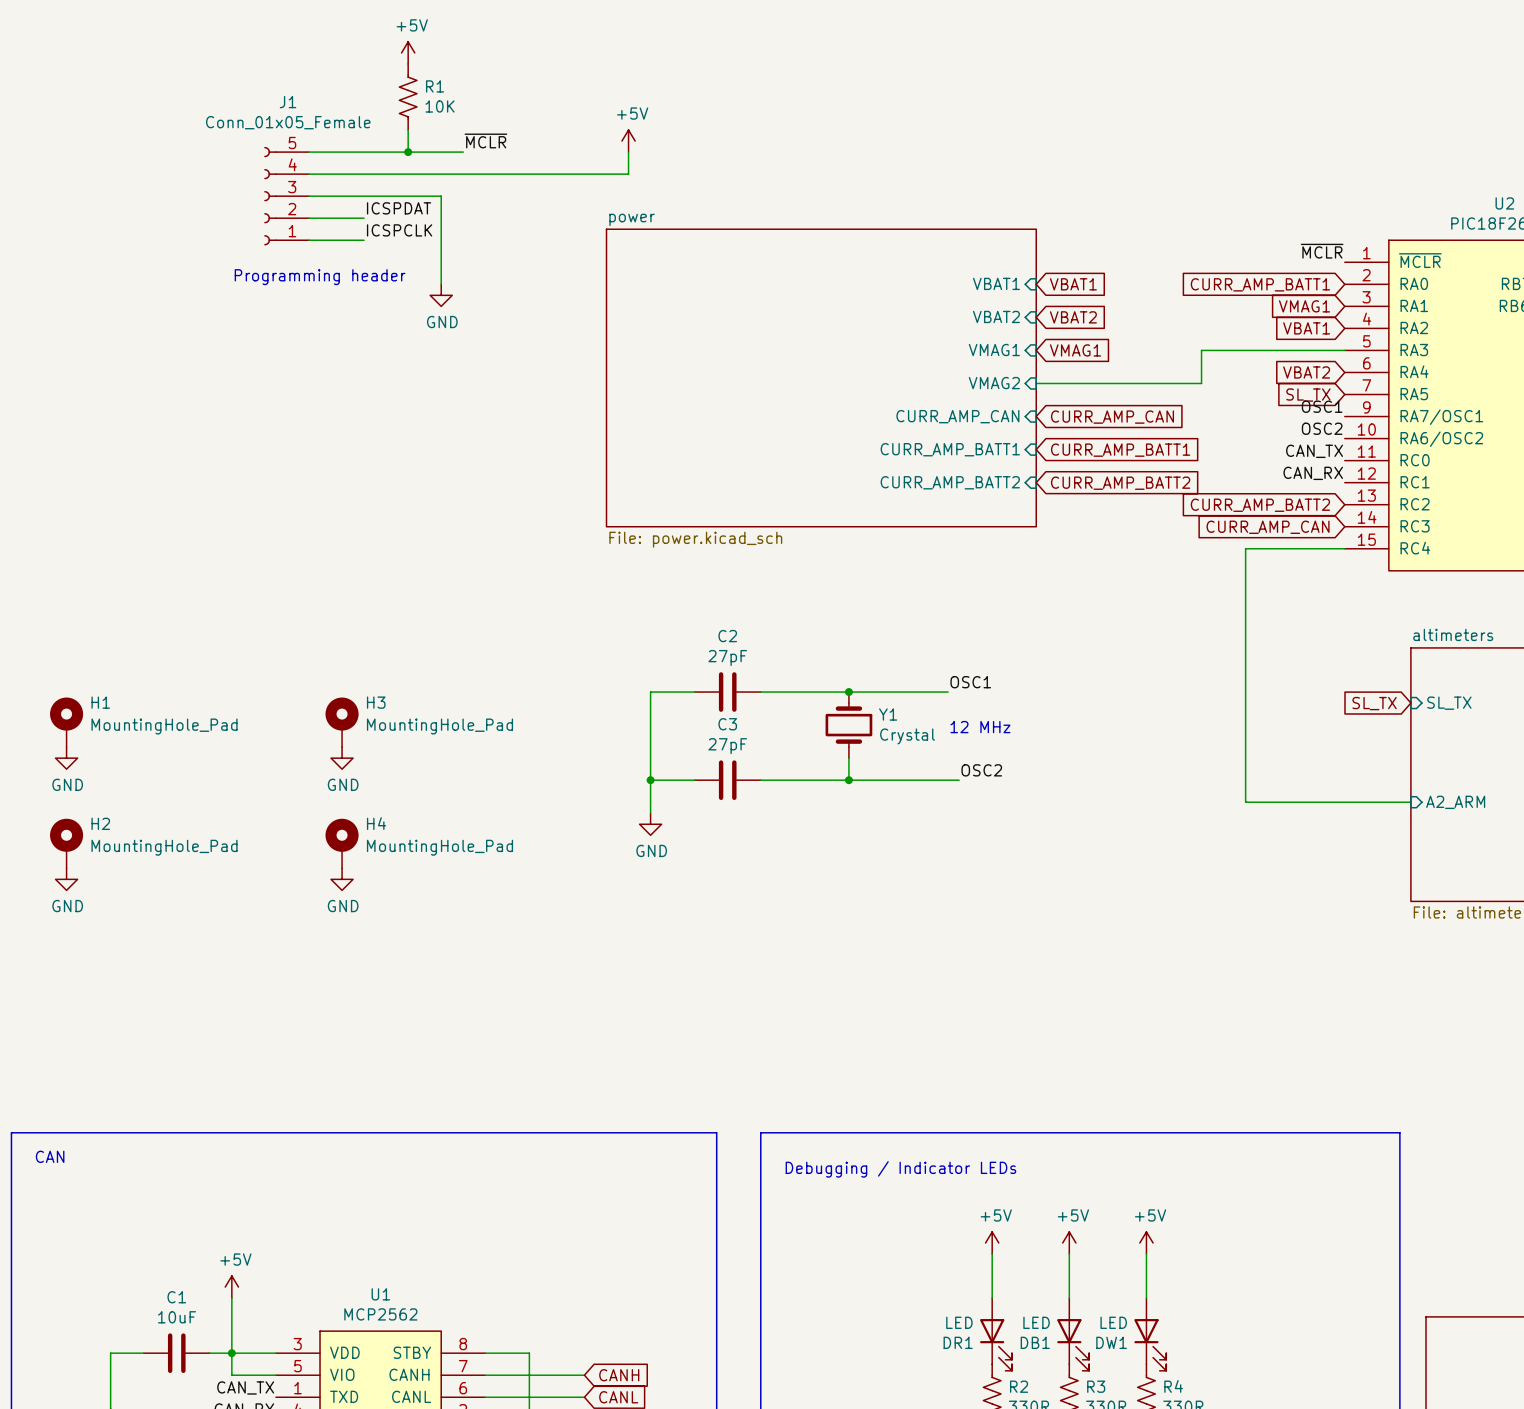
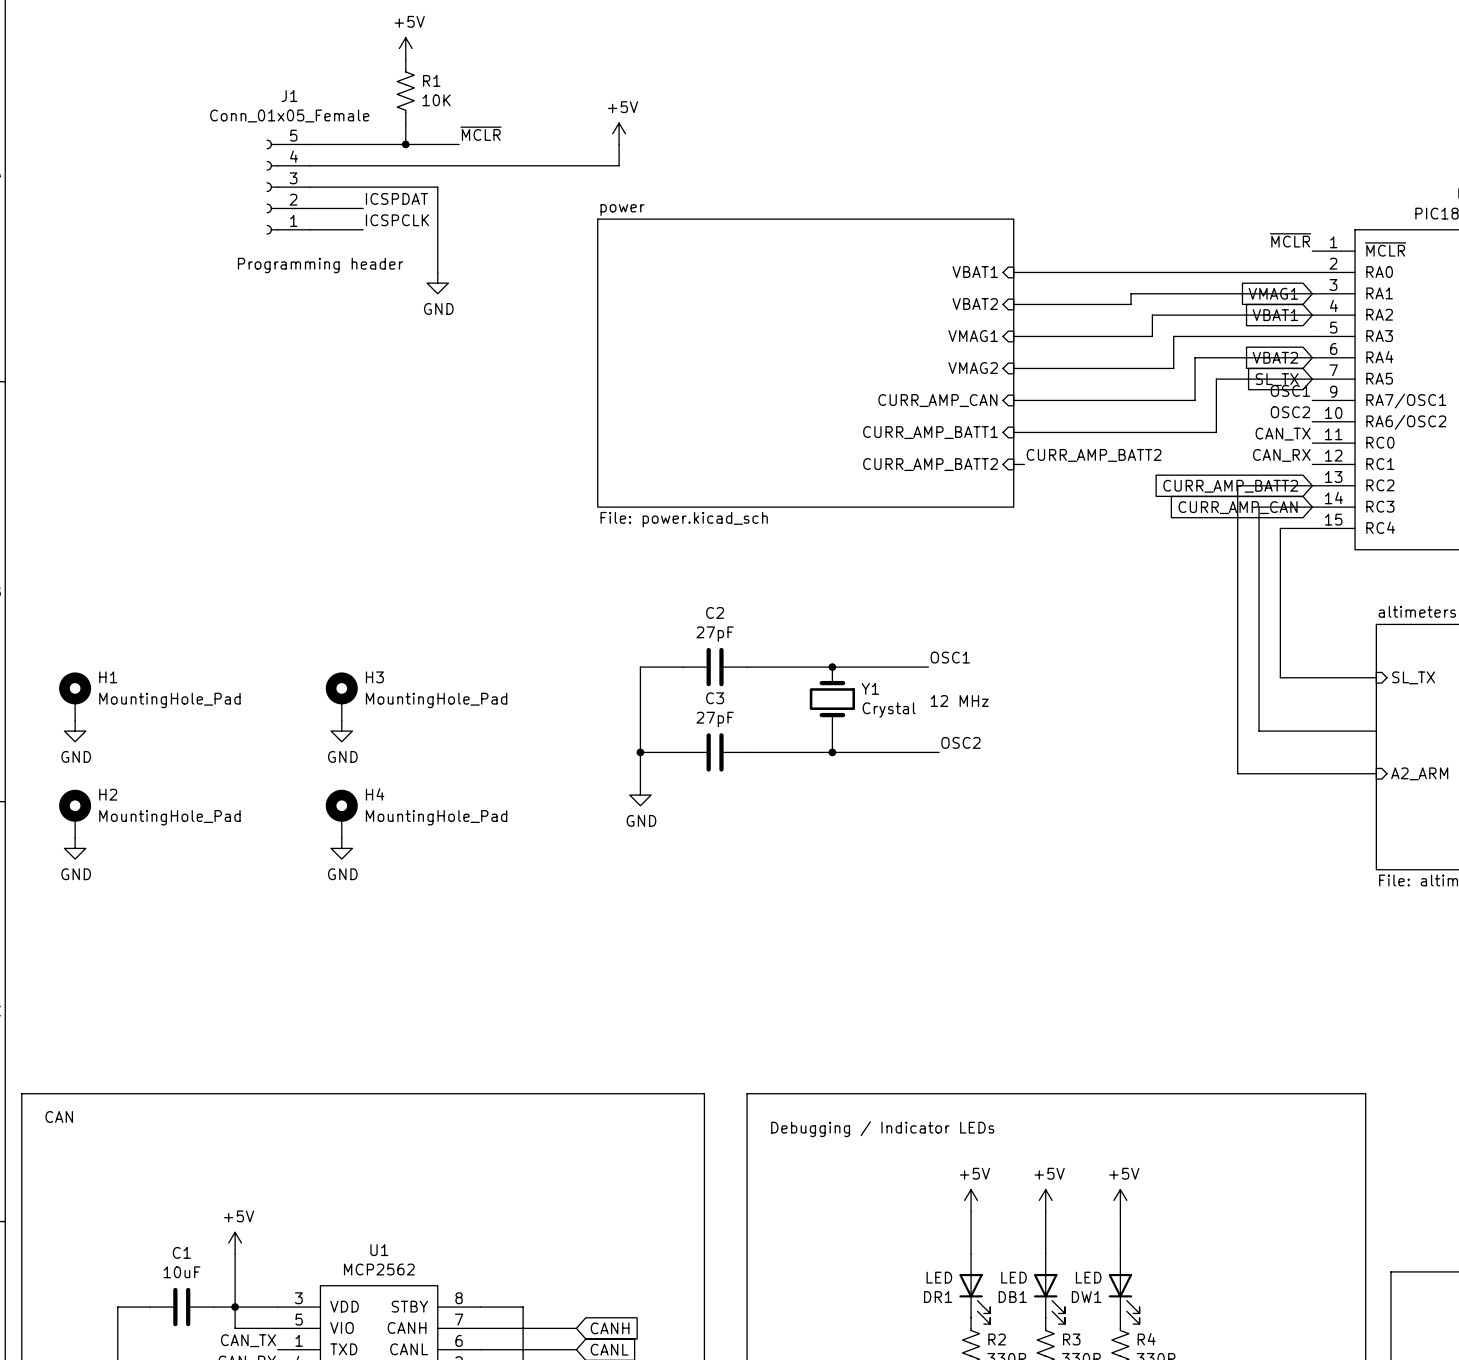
wire: none -> (1013, 272) (1312, 272)
global label: VBAT1 (1073, 284) -> none
global label: CURR_AMP_BATT1 (1260, 284) -> none
wire: none -> (1312, 293) (1131, 293) (1131, 304) (1013, 304)
global label: VBAT2 (1073, 317) -> none
wire: none -> (1312, 315) (1152, 315) (1152, 336) (1013, 336)
global label: VMAG1 (1075, 350) -> none
wire: none -> (1312, 357) (1195, 357) (1195, 400) (1013, 400)
wire: none -> (1312, 379) (1216, 379) (1216, 432) (1013, 432)
global label: CURR_AMP_CAN (1112, 417) -> none
global label: CURR_AMP_BATT1 (1120, 450) -> none
label: none -> CURR_AMP_BATT2 (1094, 455)
wire: none -> (1013, 464) (1024, 464)
global label: CURR_AMP_BATT2 (1120, 483) -> none
wire: none -> (1312, 507) (1259, 507) (1259, 731) (1376, 731)
wire: (1311, 548) (1245, 548) (1245, 802) (1267, 802) -> (1312, 485) (1237, 485) (1237, 773)
wire: none -> (1280, 528) (1280, 677) (1376, 677)
global label: SL_TX (1374, 703) -> none

